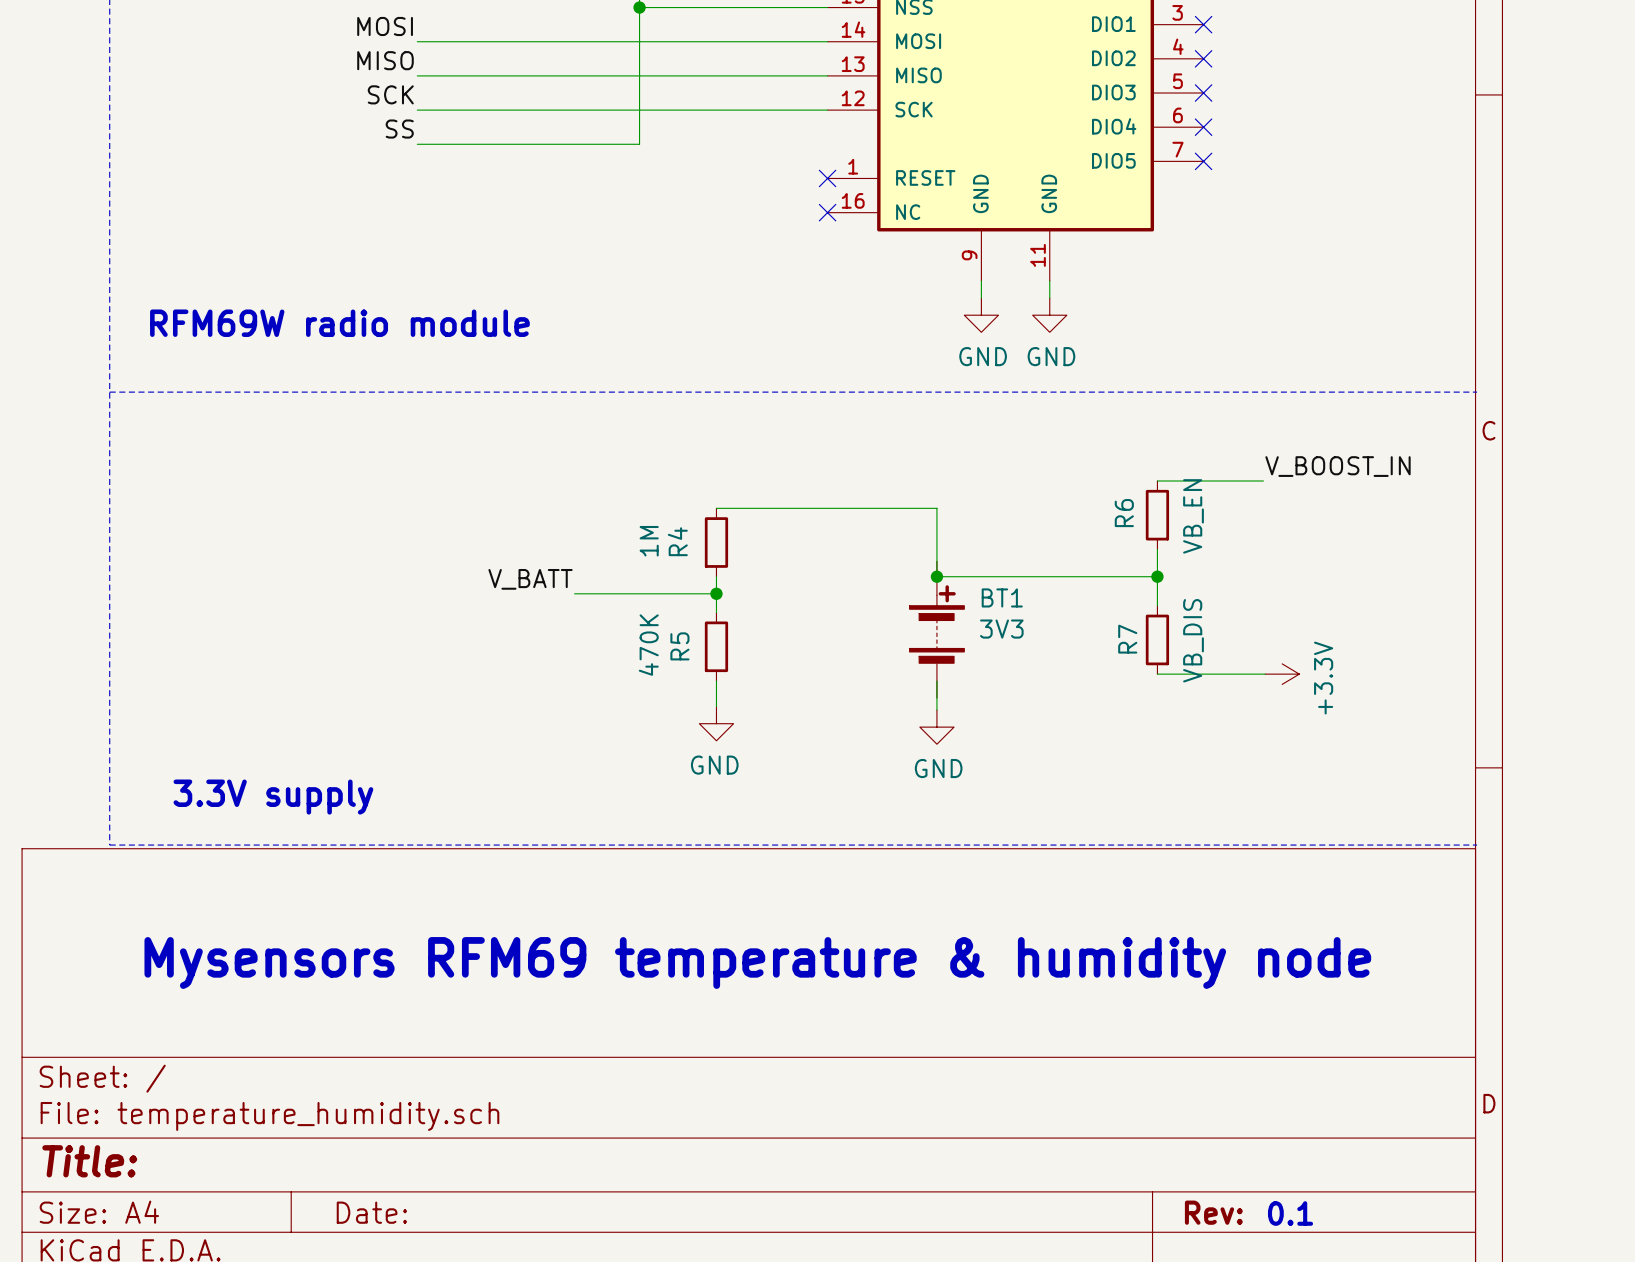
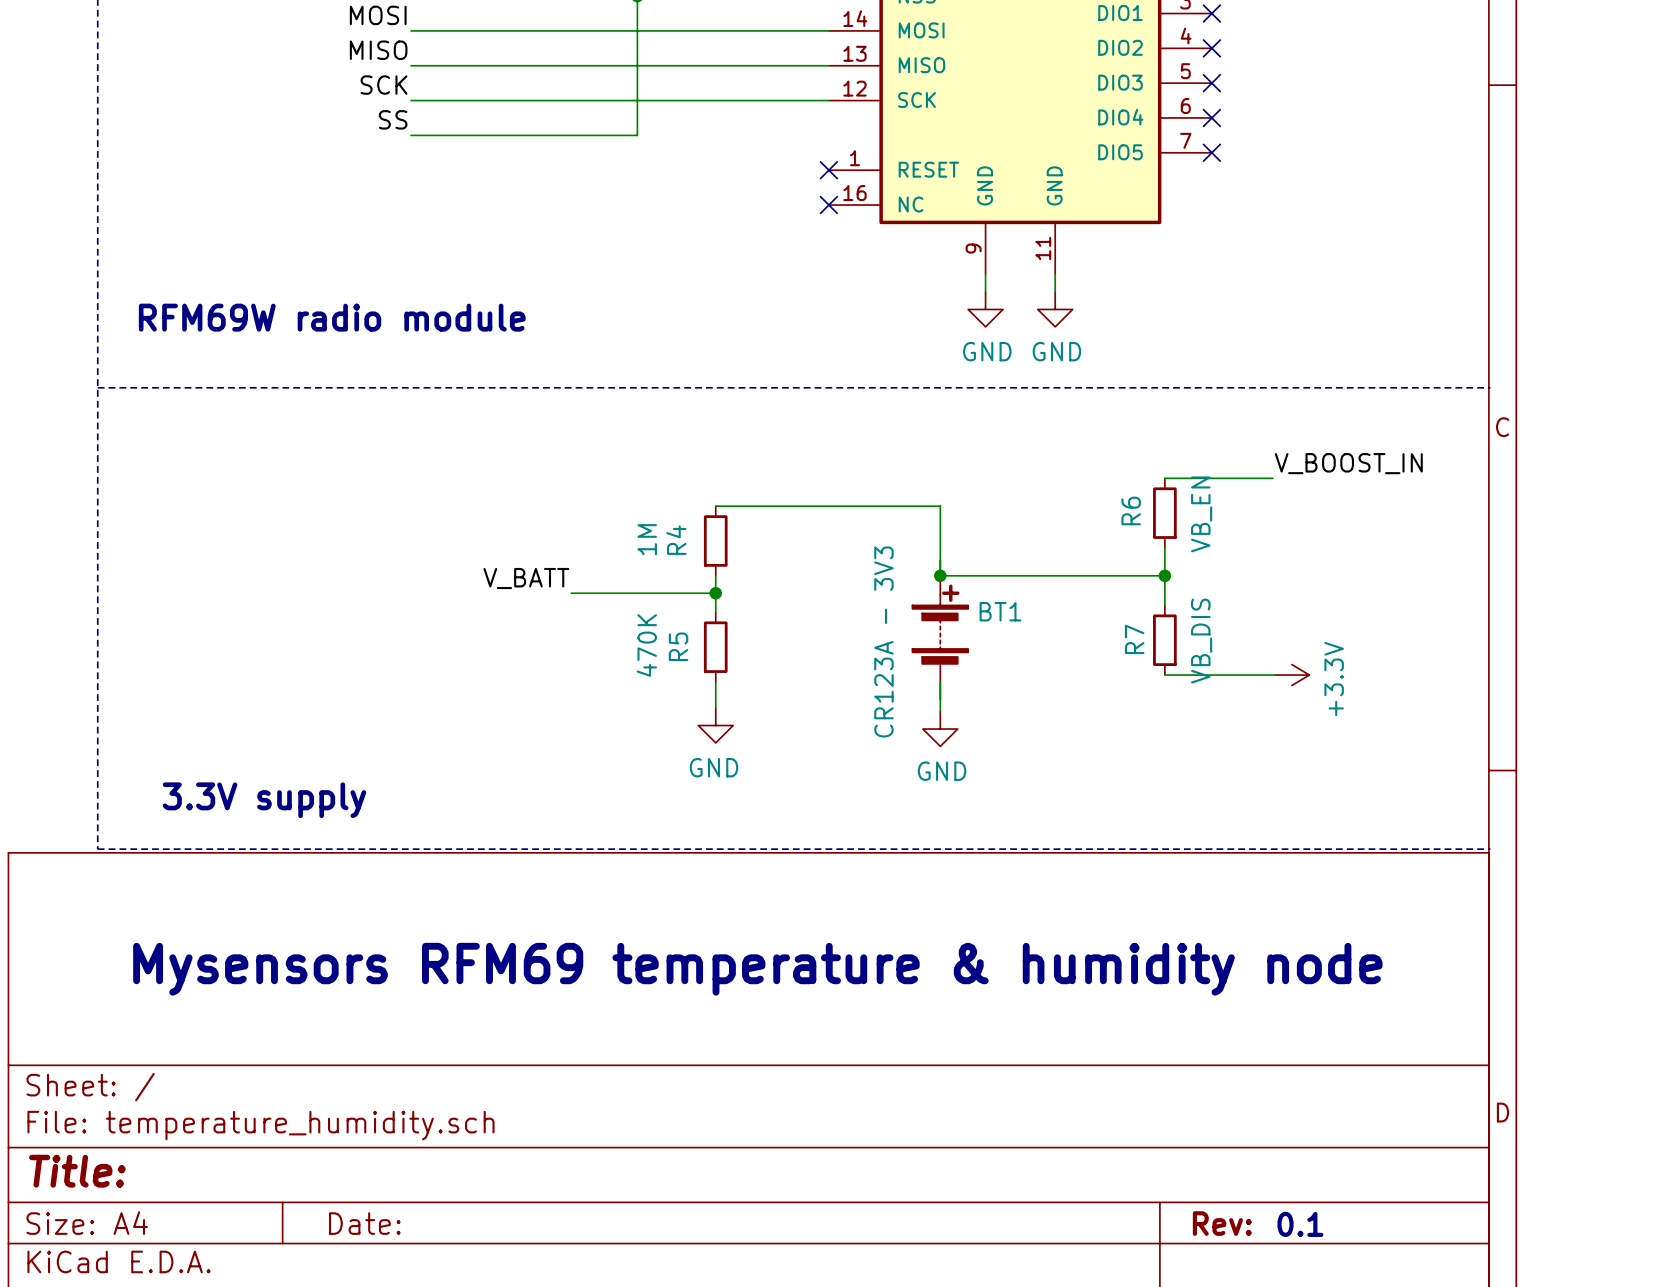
BT1 name position: BT1 (1002, 597) -> BT1 (1000, 611)
BT1 value: 3V3 (1001, 629) -> CR123A - 3V3 (883, 642)

